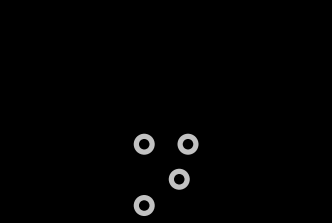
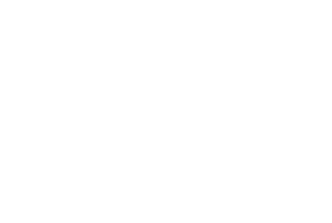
via: (144, 144) -> none
via: (188, 144) -> none
via: (179, 179) -> none
via: (144, 205) -> none

